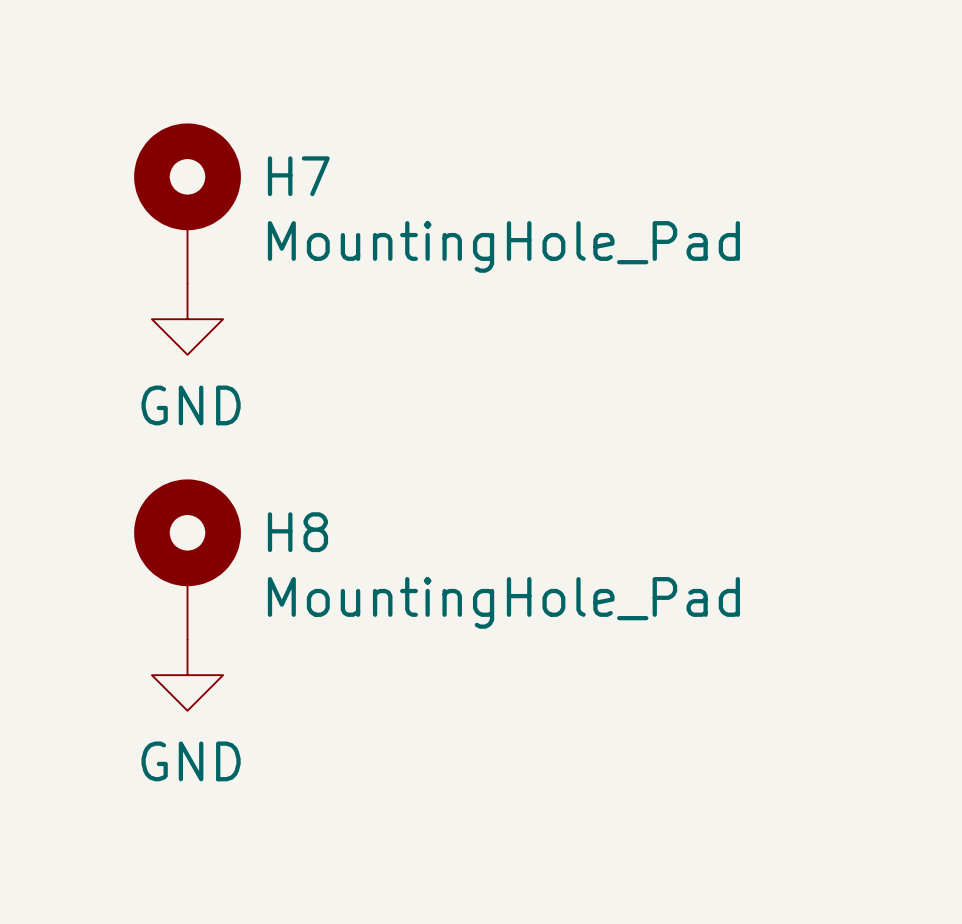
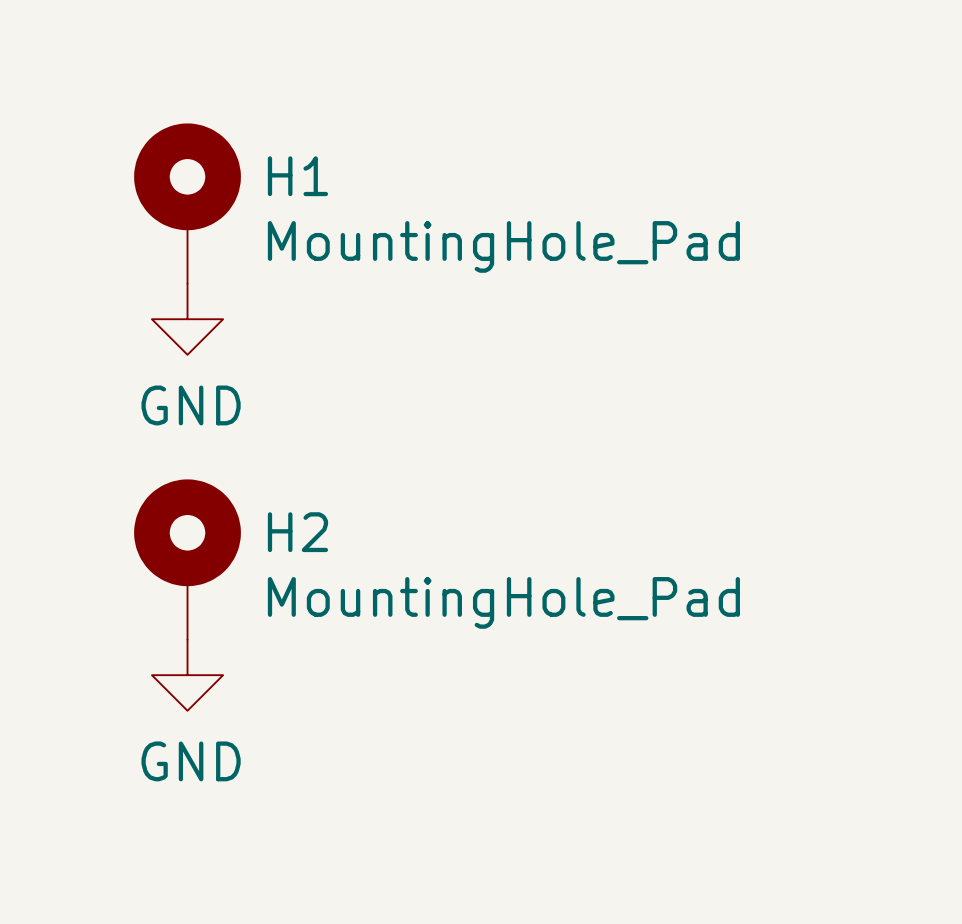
H7 name: H7 (298, 176) -> H1 (297, 176)
H8 name: H8 (297, 532) -> H2 (297, 532)

